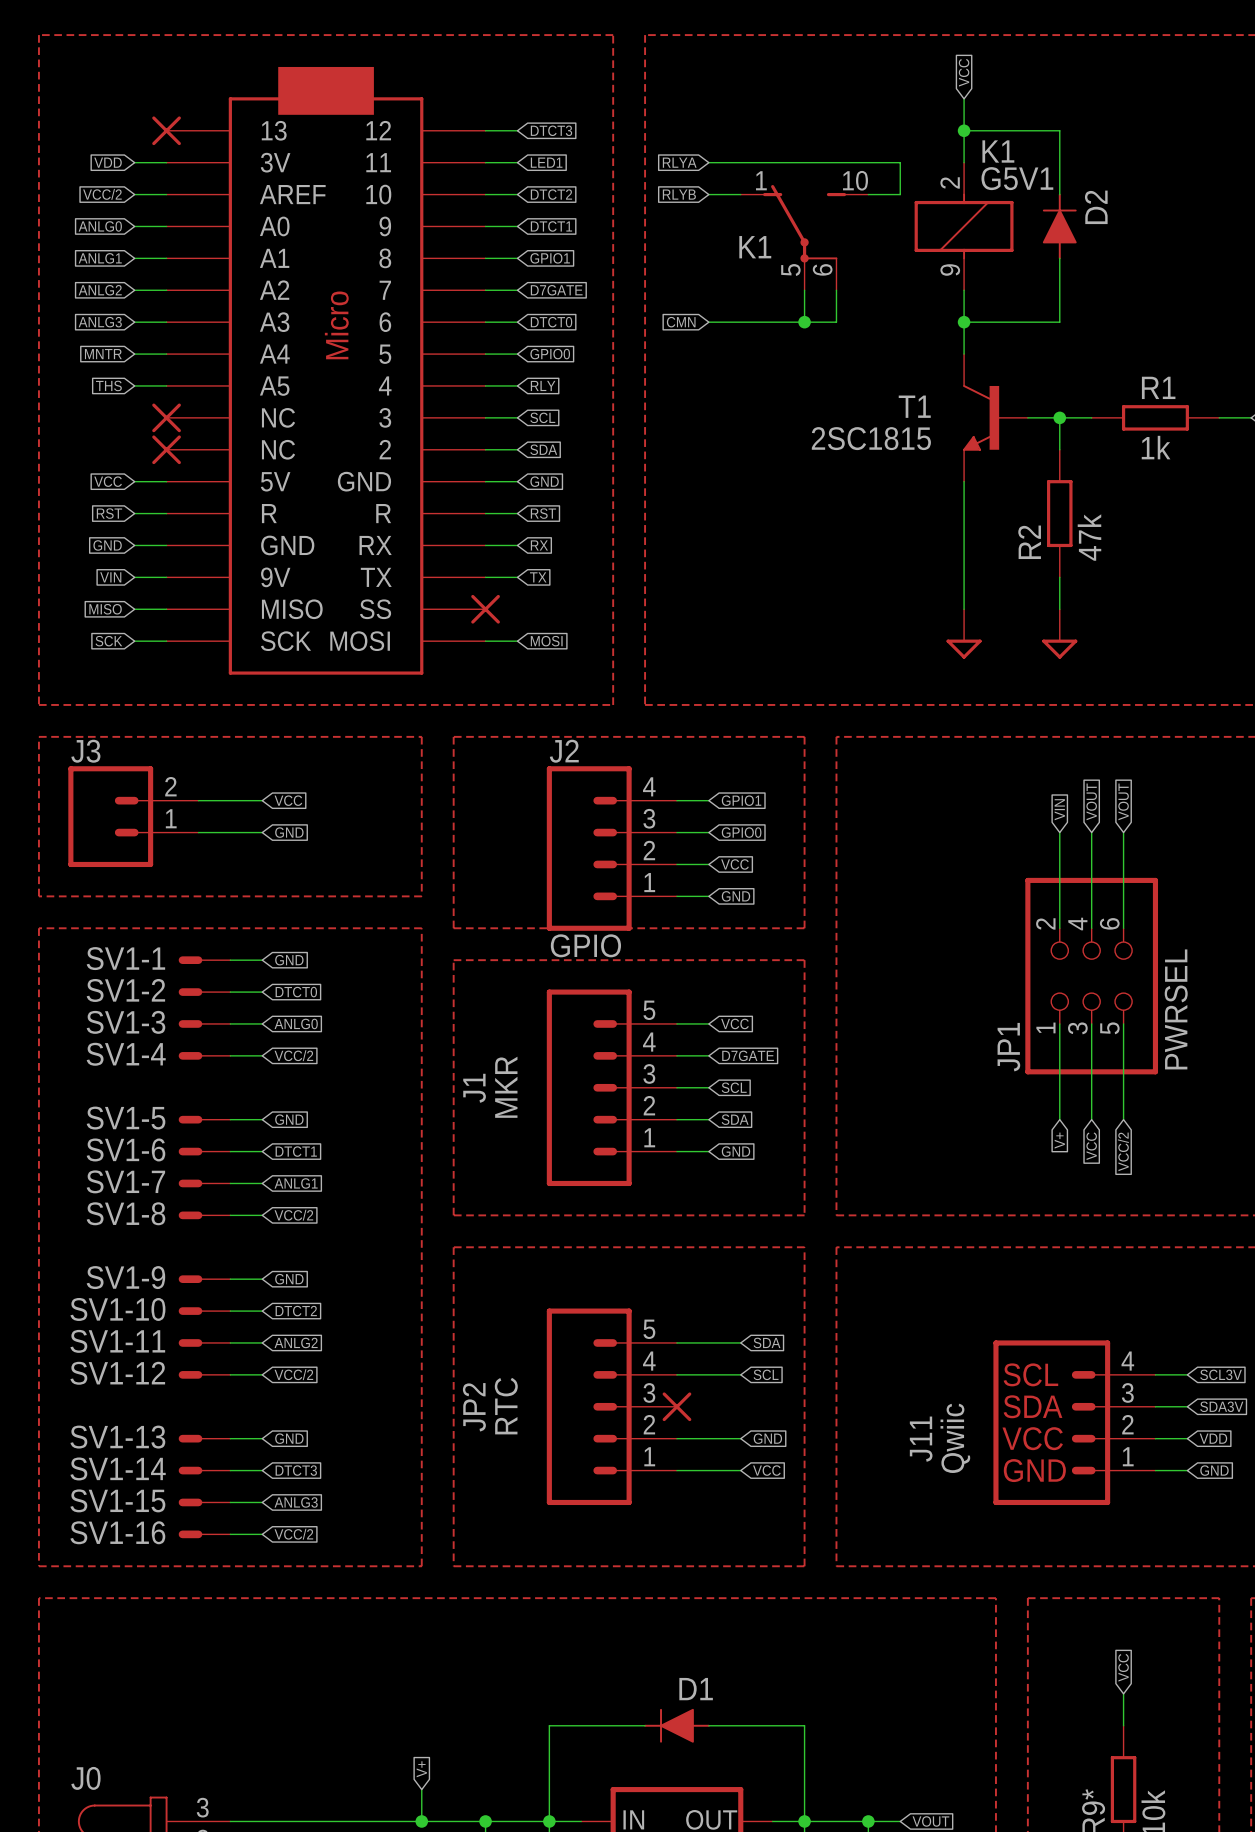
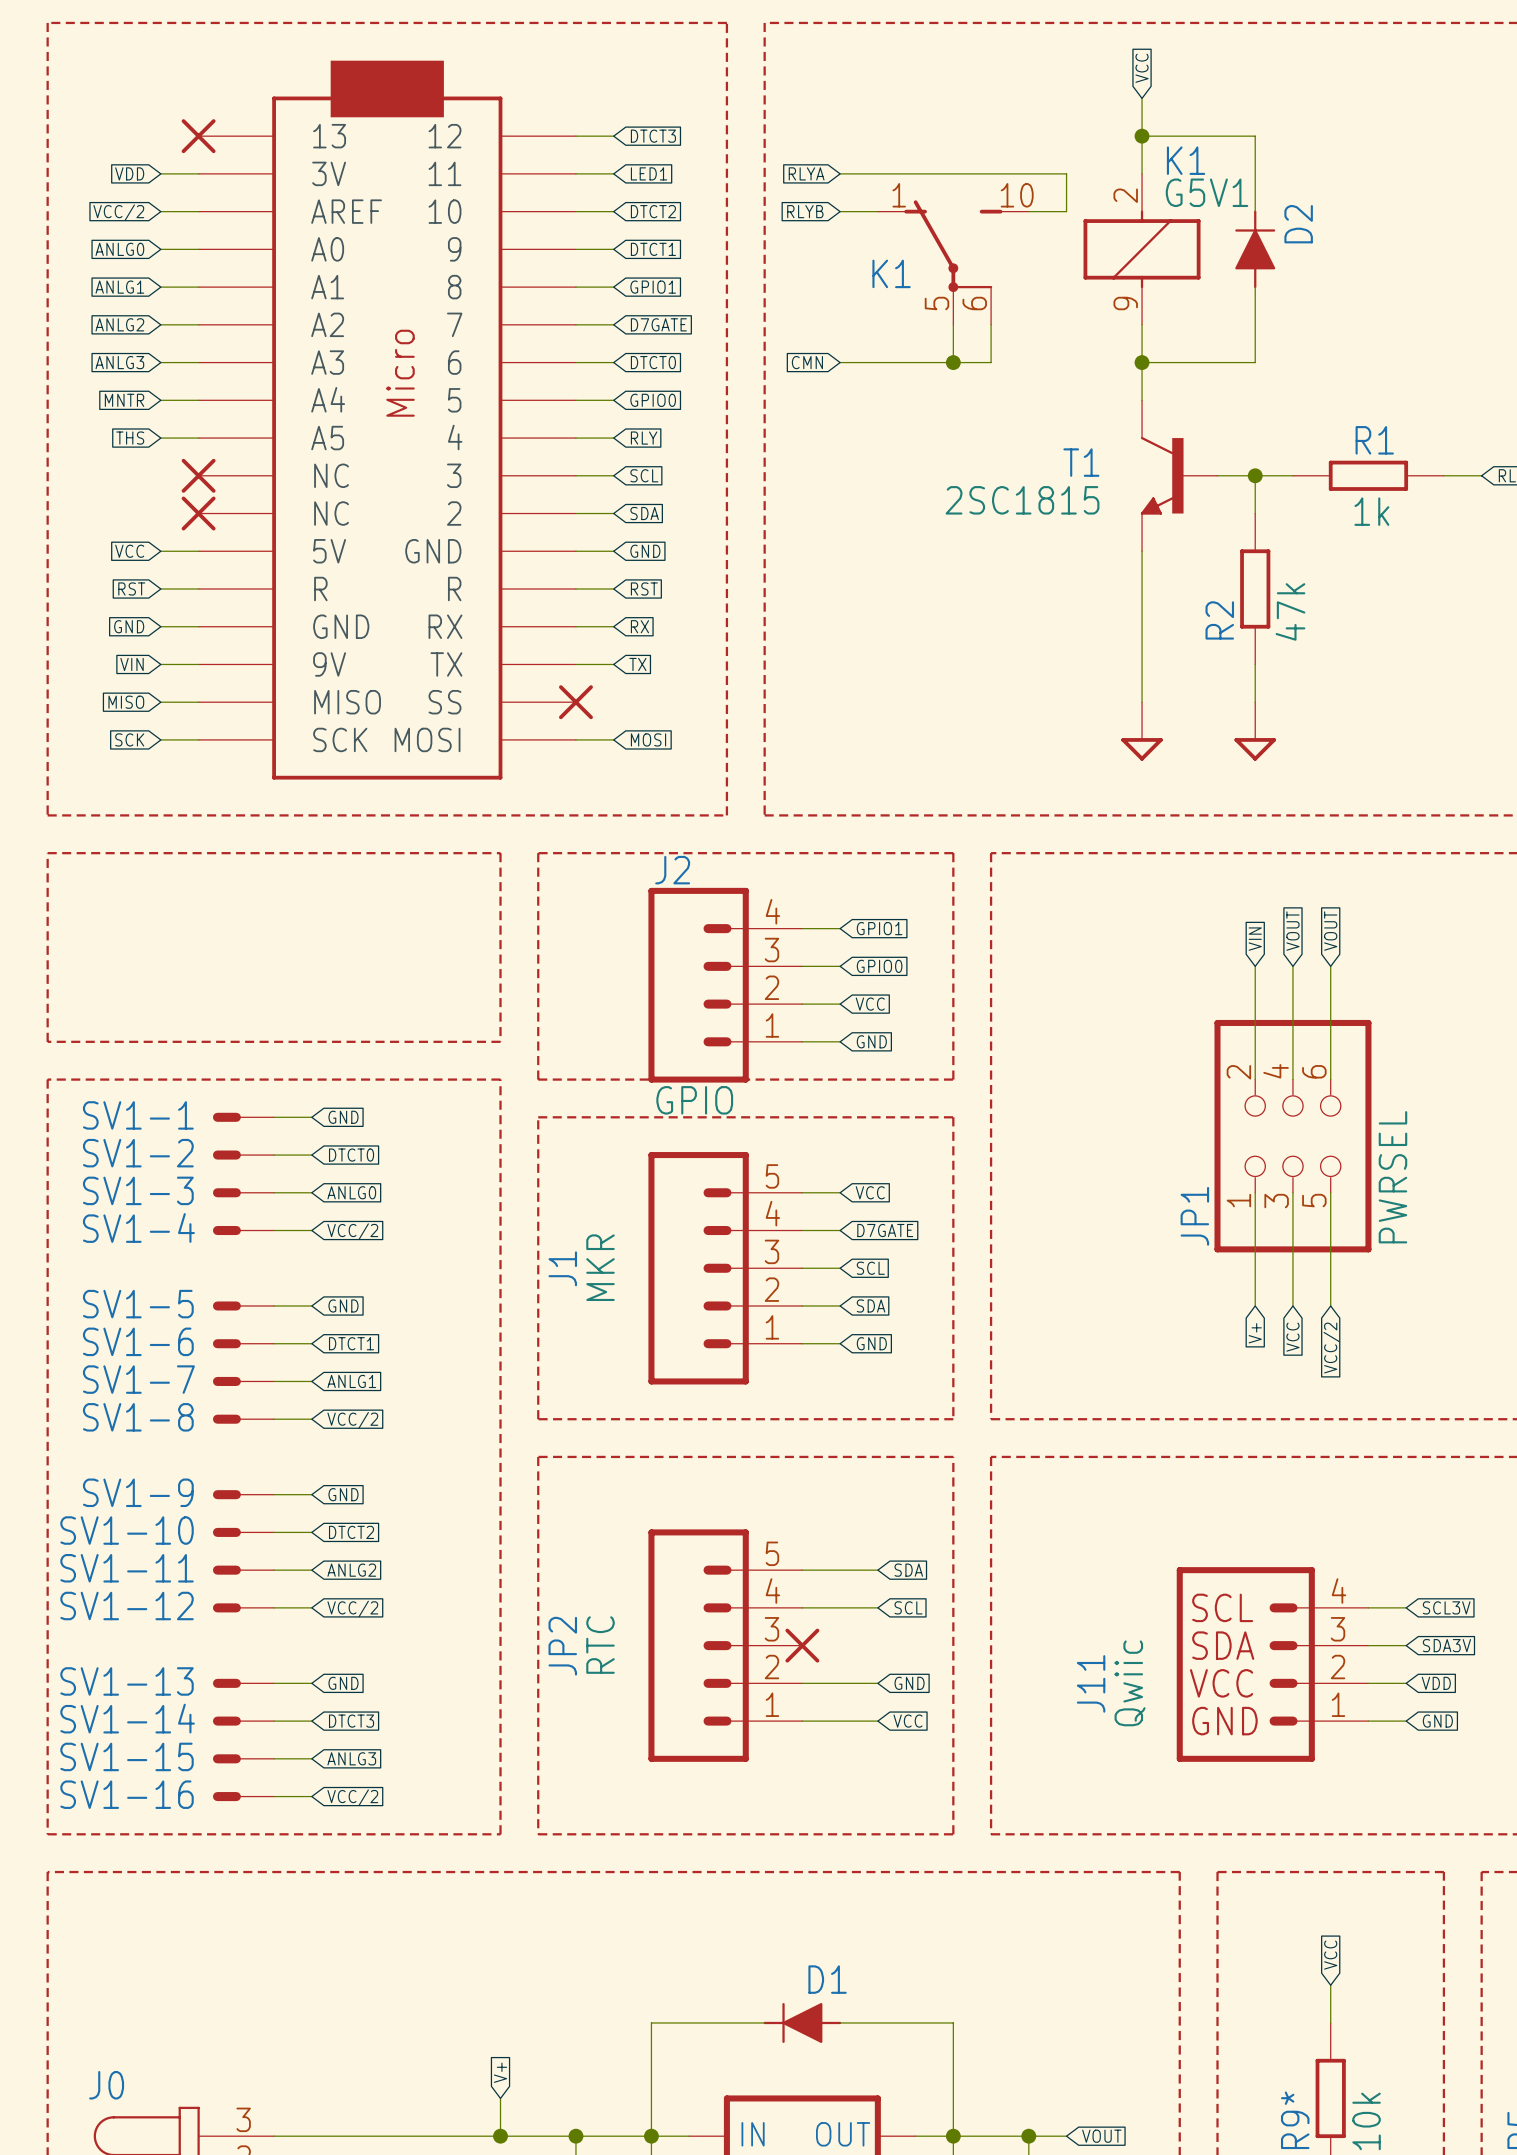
wire: (198, 800) (262, 800) -> none
global label: VCC (288, 800) -> none
J3: (133, 816) -> none
wire: (198, 832) (262, 832) -> none
global label: GND (289, 832) -> none

